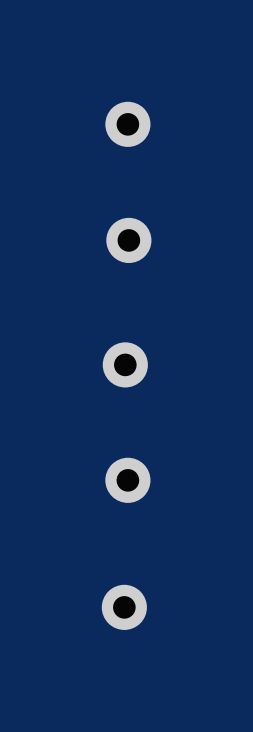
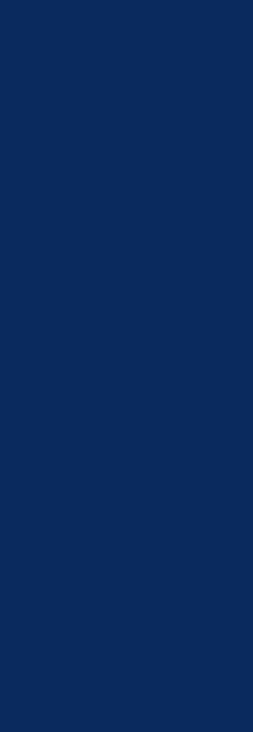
part: (127, 124) -> none
part: (128, 240) -> none
part: (125, 364) -> none
part: (127, 480) -> none
part: (124, 607) -> none

